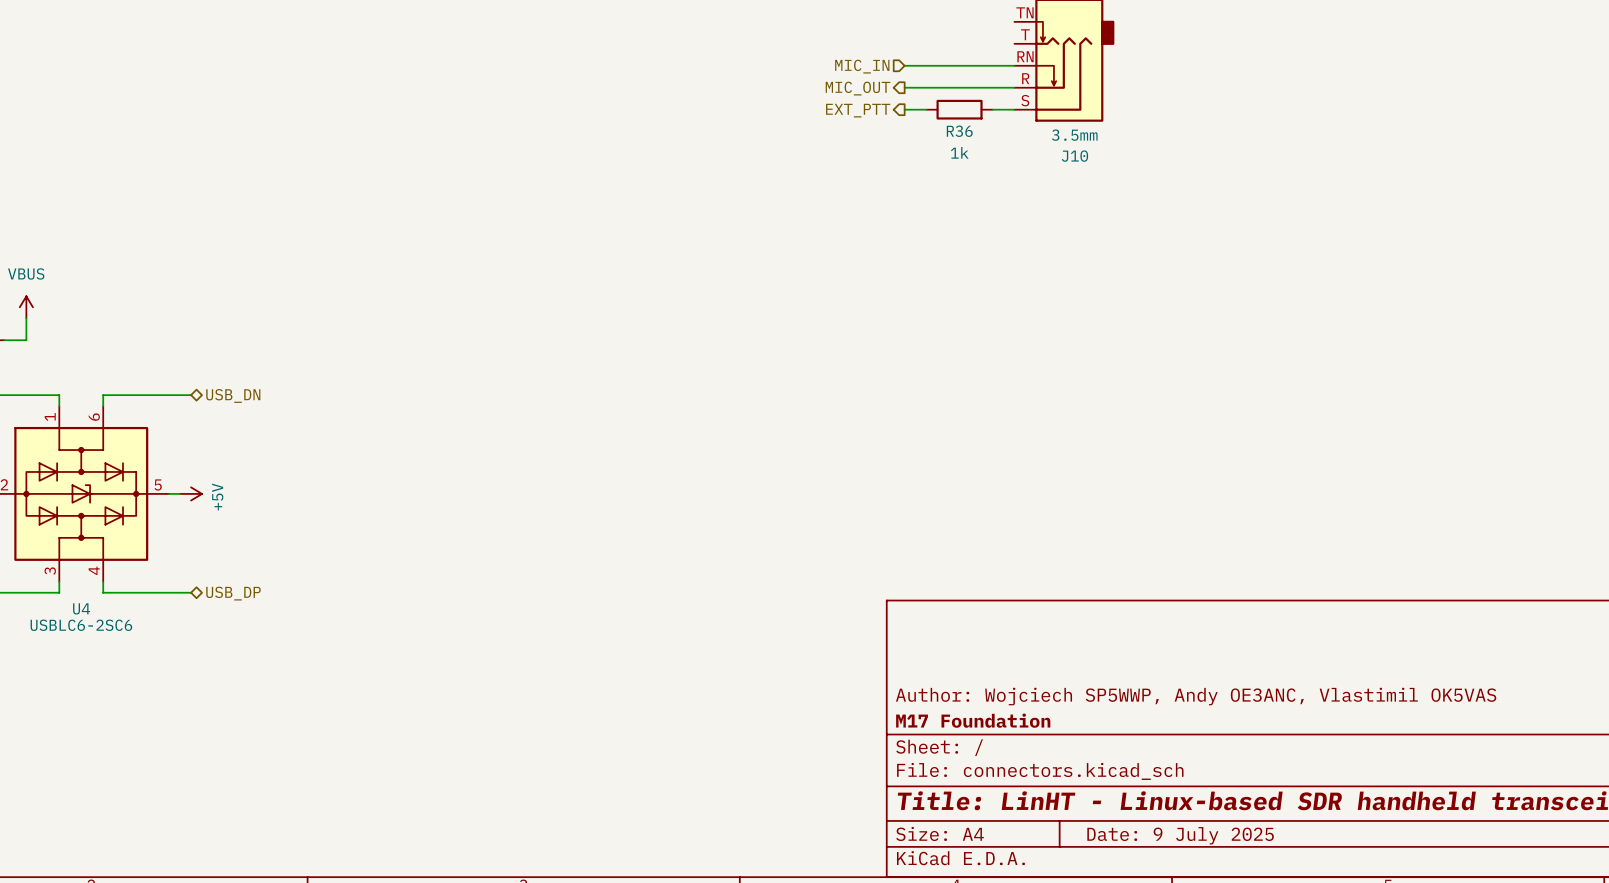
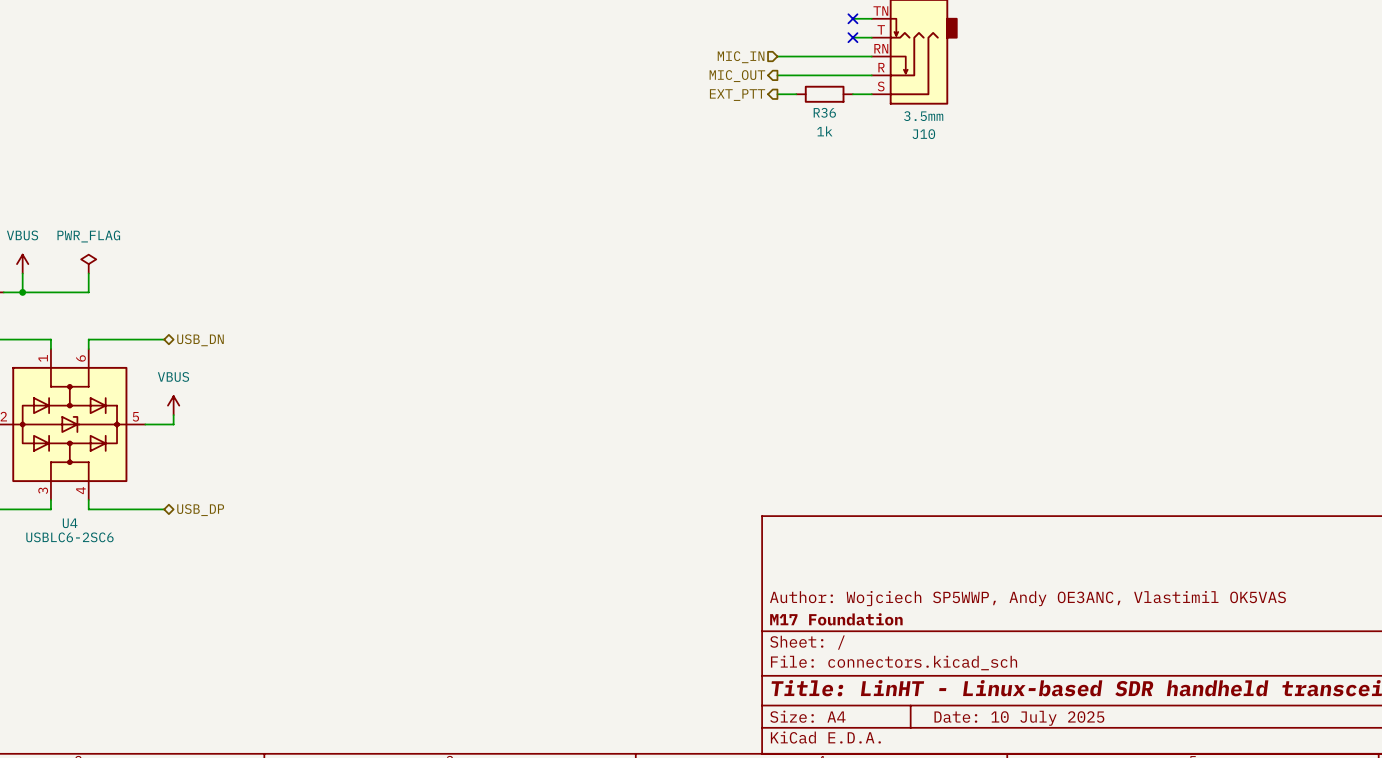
wire: none -> (852, 18) (871, 18)
no-connect mark: none -> (852, 18)
wire: none -> (852, 37) (871, 37)
no-connect mark: none -> (852, 37)
power symbol: none -> PWR_FLAG (88, 264)
wire: none -> (88, 273) (88, 292) (22, 292)
junction: none -> (22, 292)
power symbol: none -> VBUS (173, 405)
power symbol: +5V (191, 493) -> none
title block: Date: 9 July 2025 (1180, 835) -> Date: 10 July 2025 (1019, 718)

